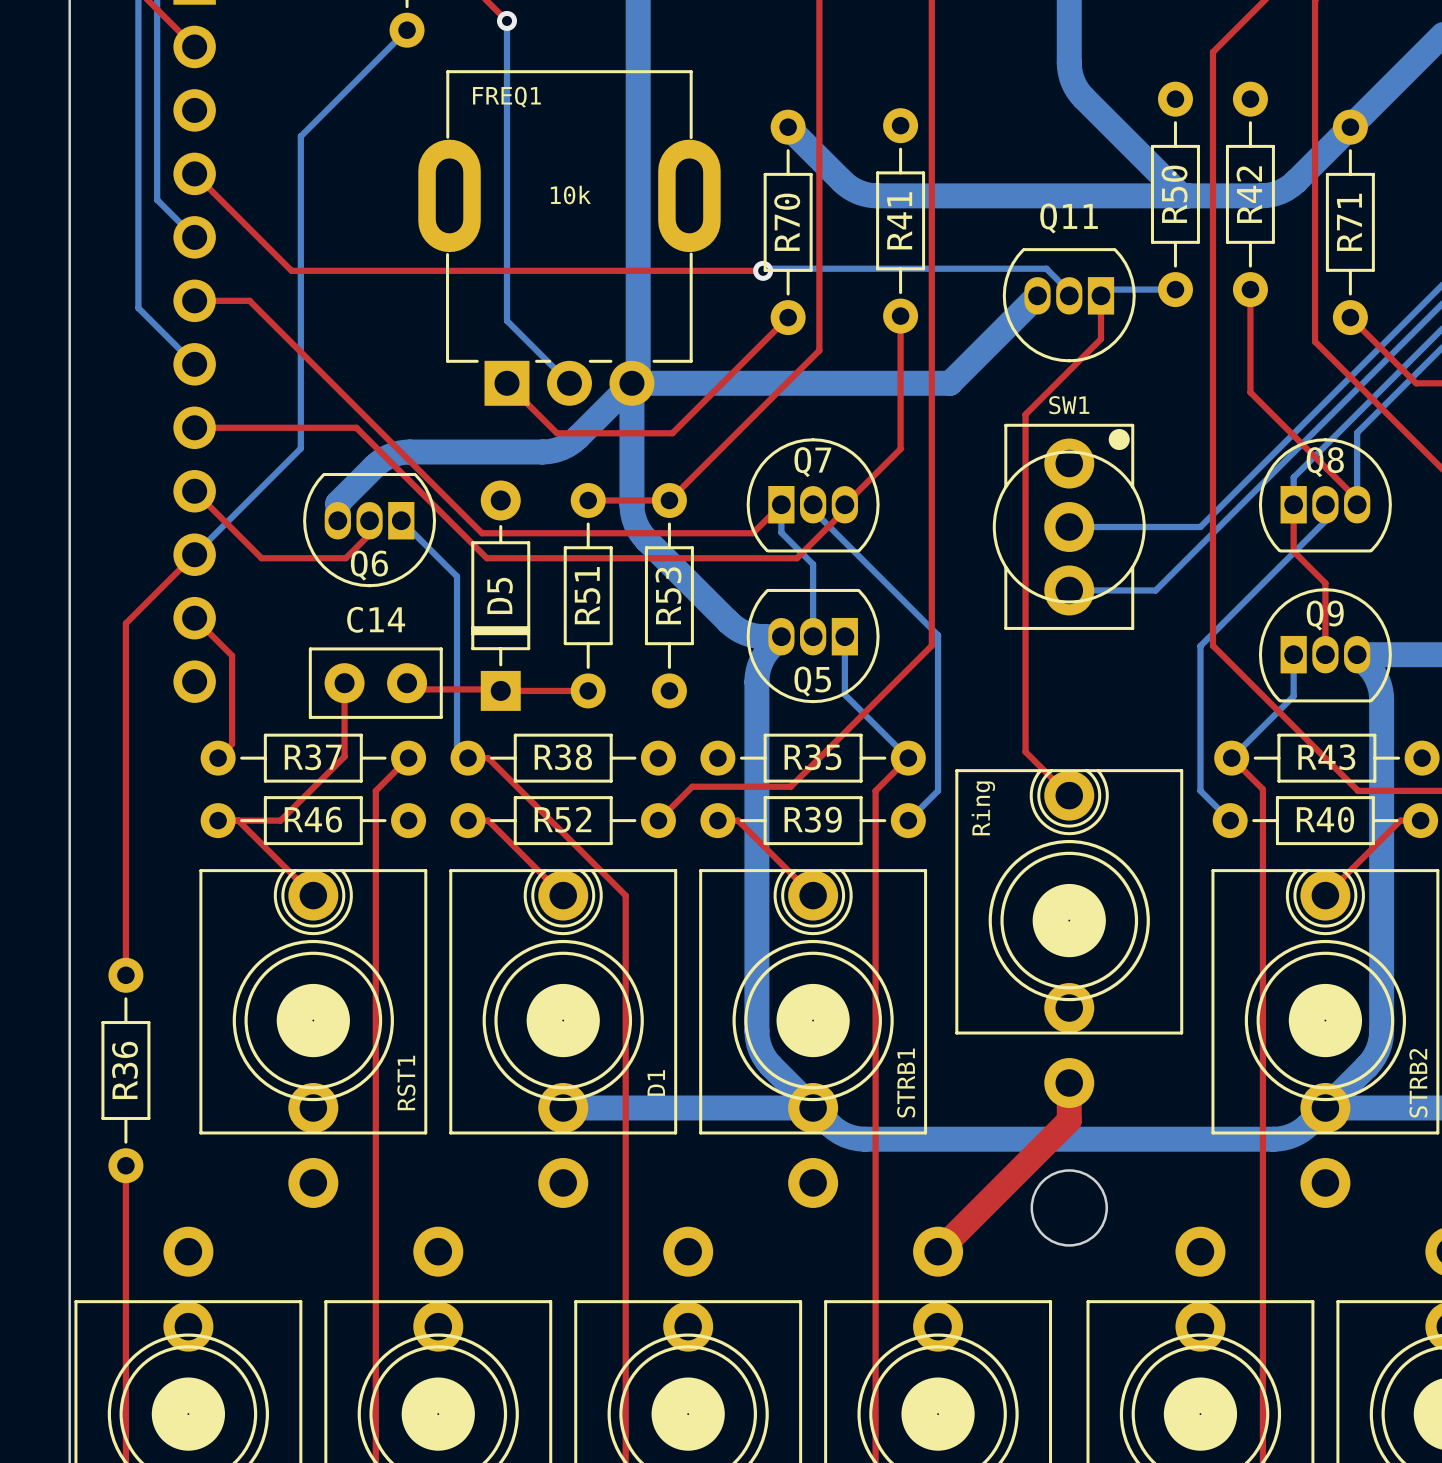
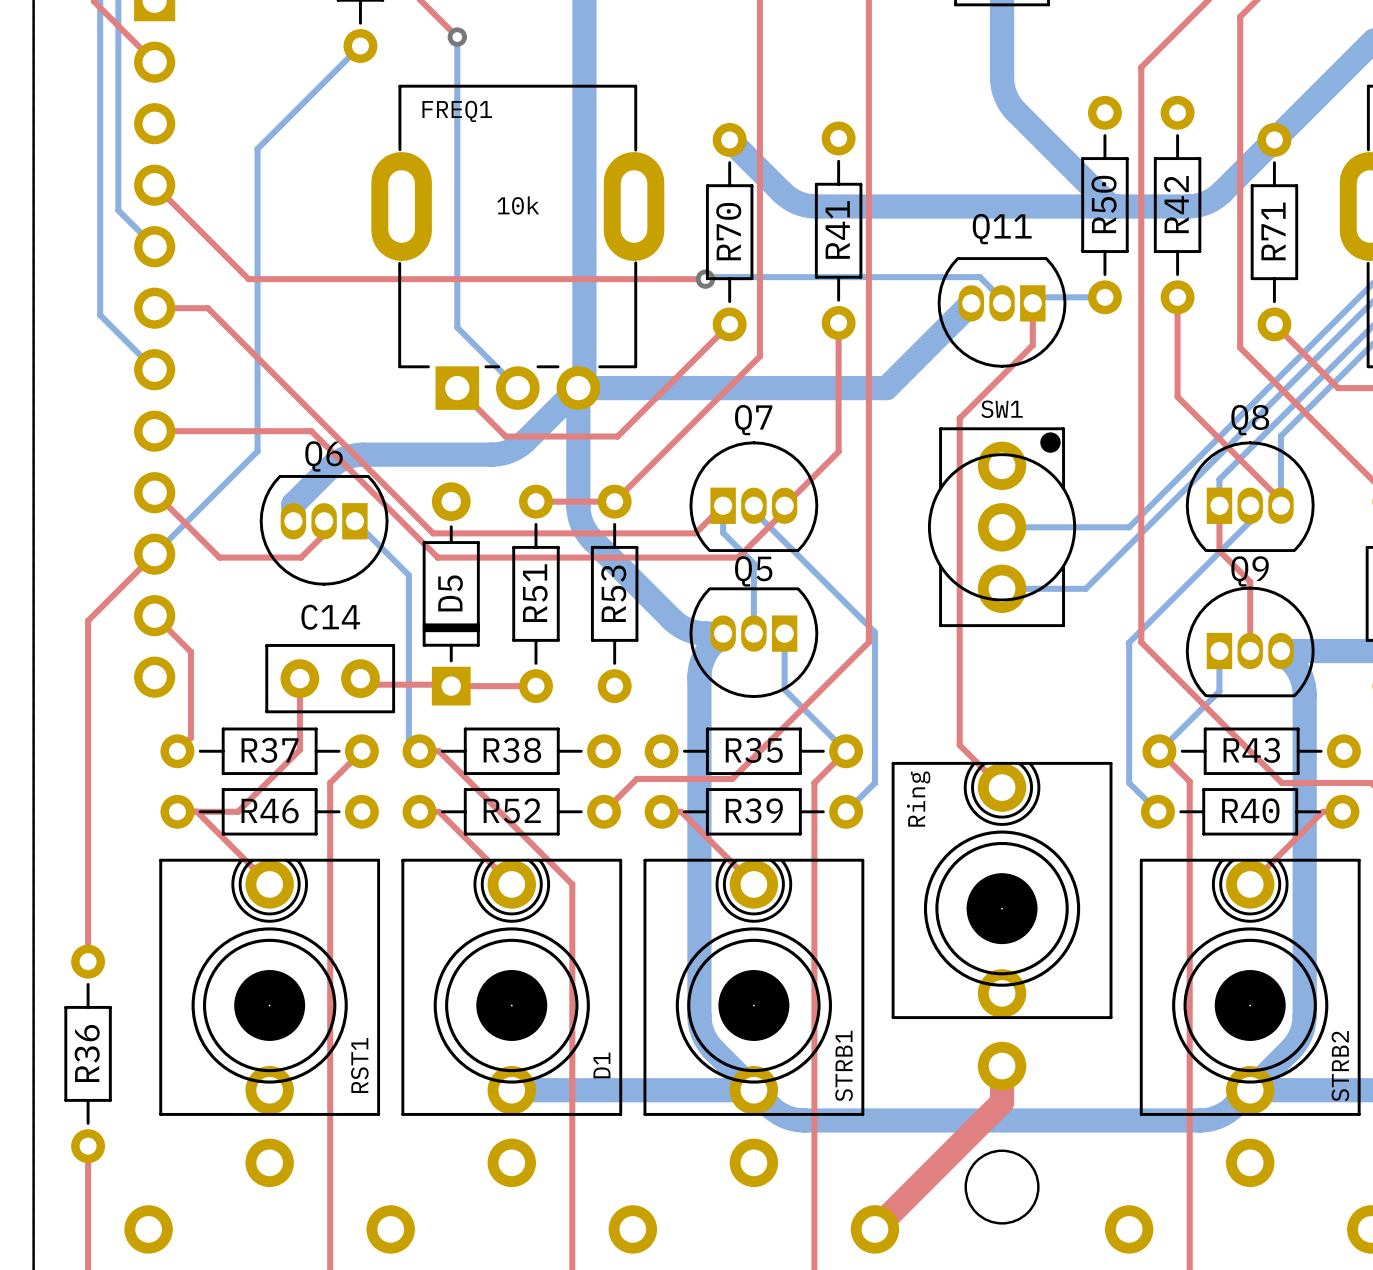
Q7 name position: Q7 (812, 462) -> Q7 (753, 420)
Q8 name position: Q8 (1325, 462) -> Q8 (1250, 420)
Q6 name position: Q6 (369, 565) -> Q6 (324, 456)
Q9 name position: Q9 (1325, 615) -> Q9 (1250, 571)
Q5 name position: Q5 (812, 681) -> Q5 (753, 571)

